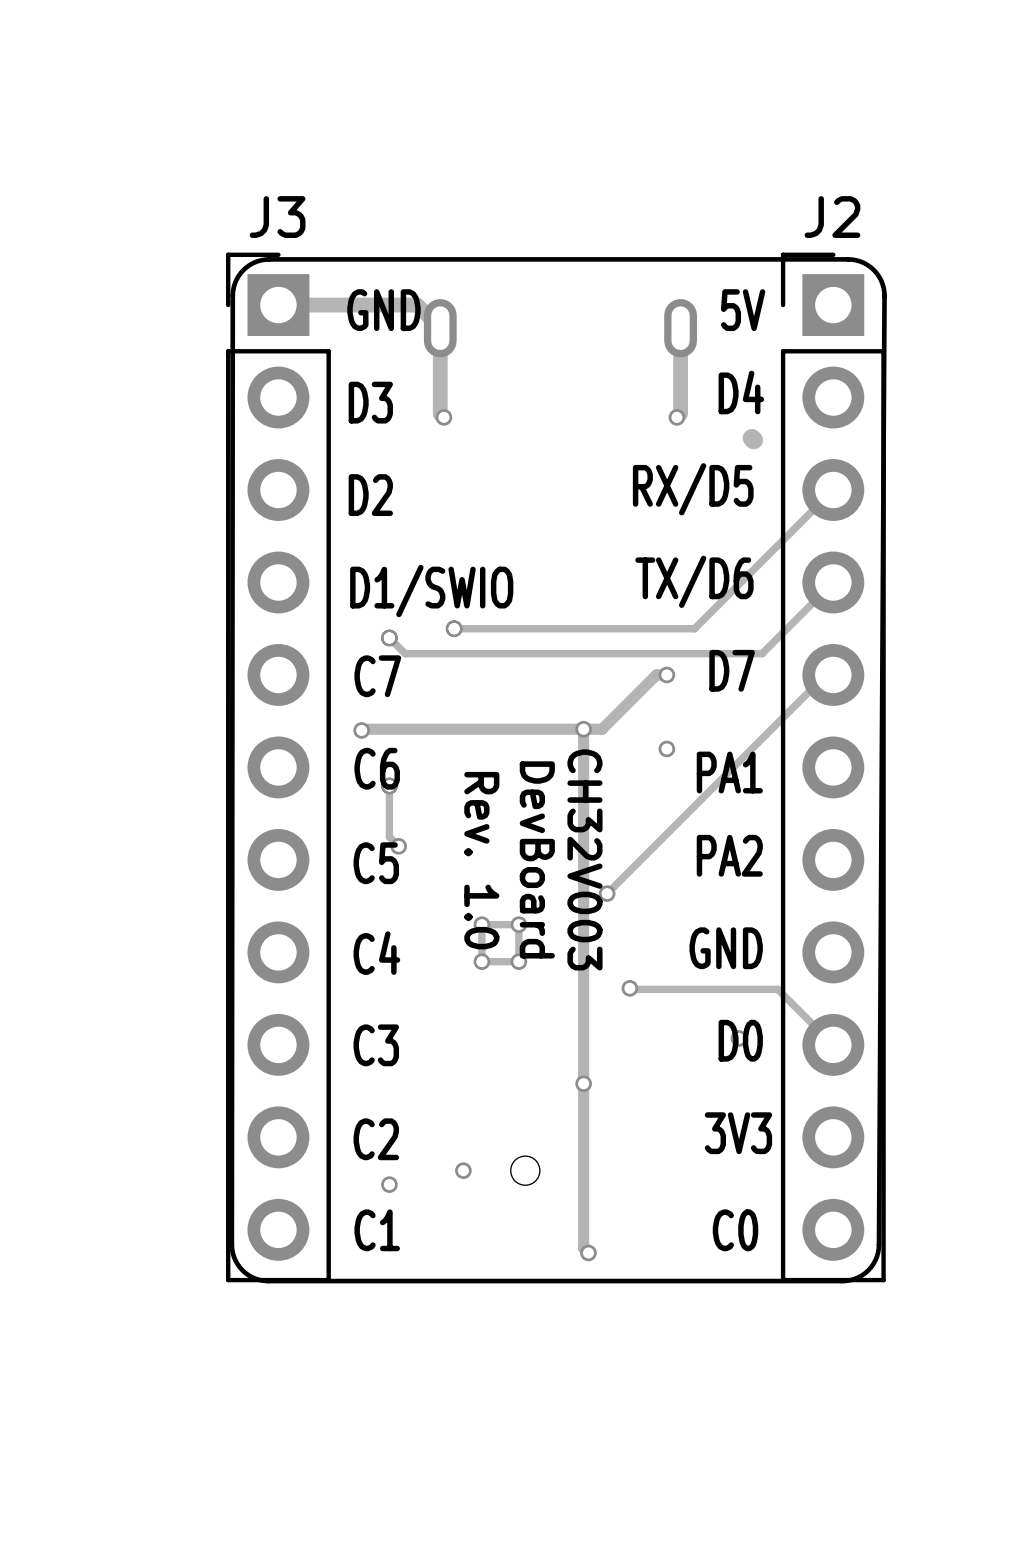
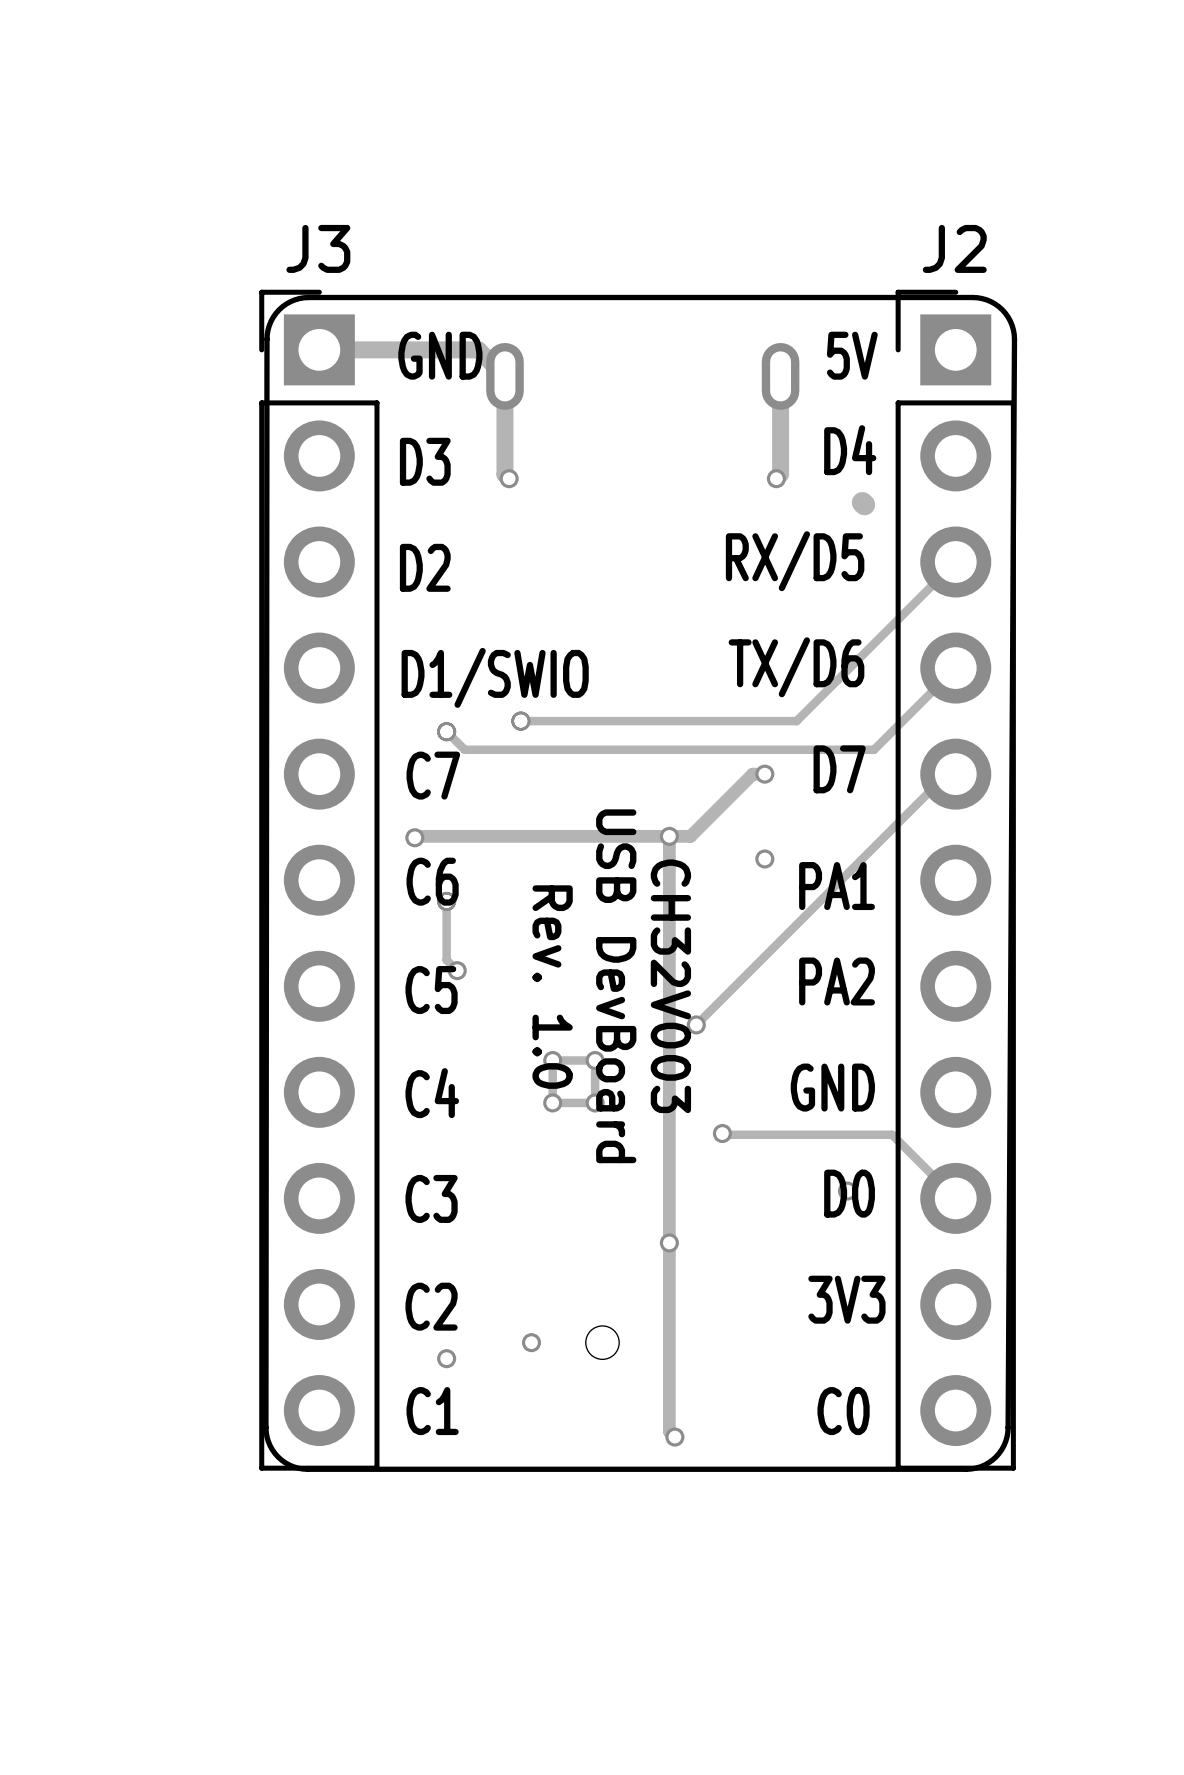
text: DevBoard (537, 859) -> USB DevBoard (616, 986)

